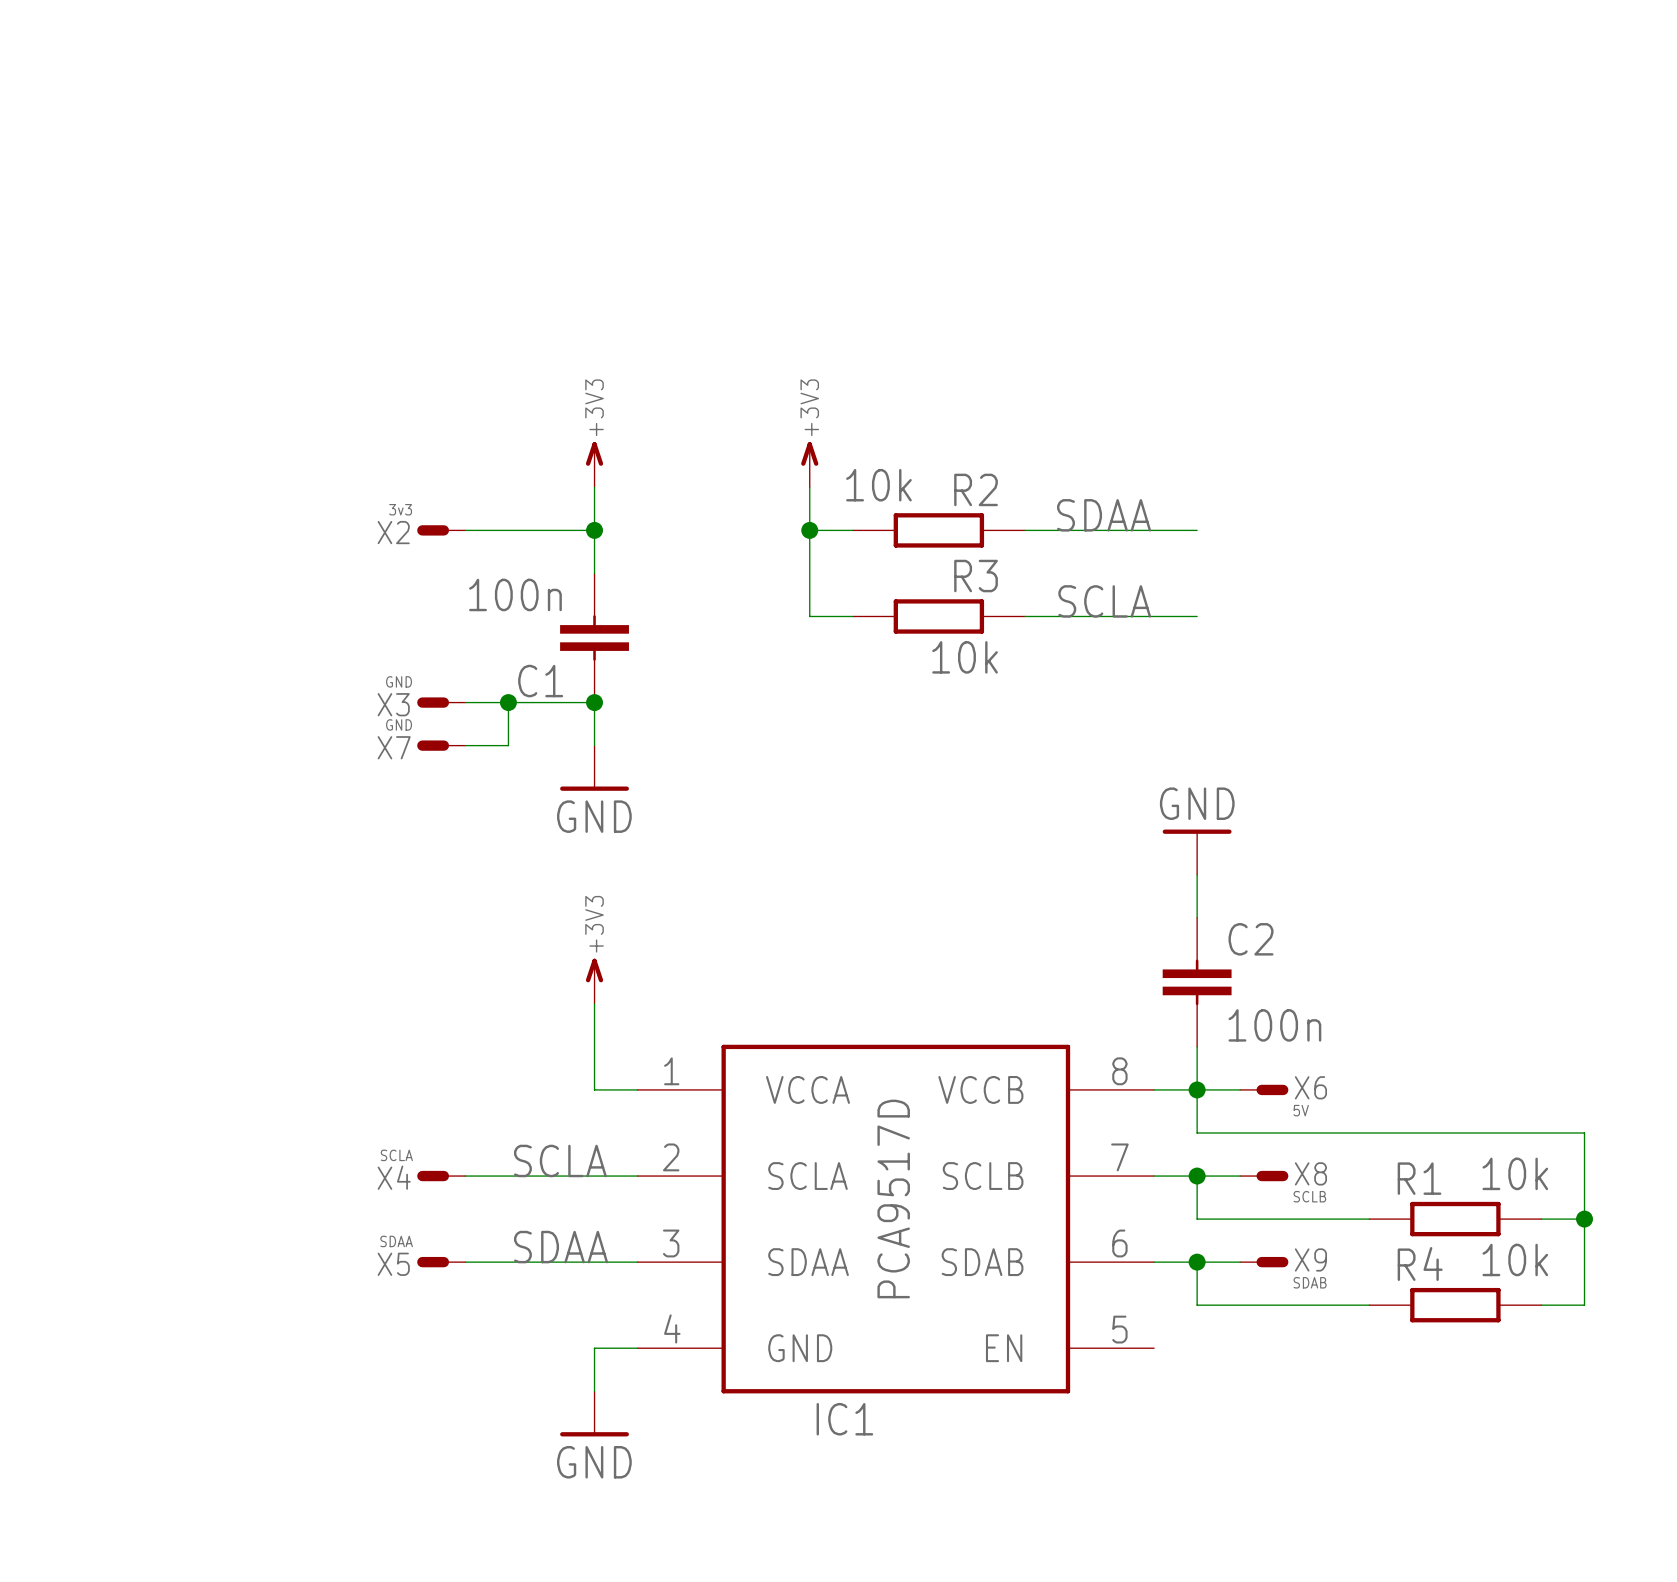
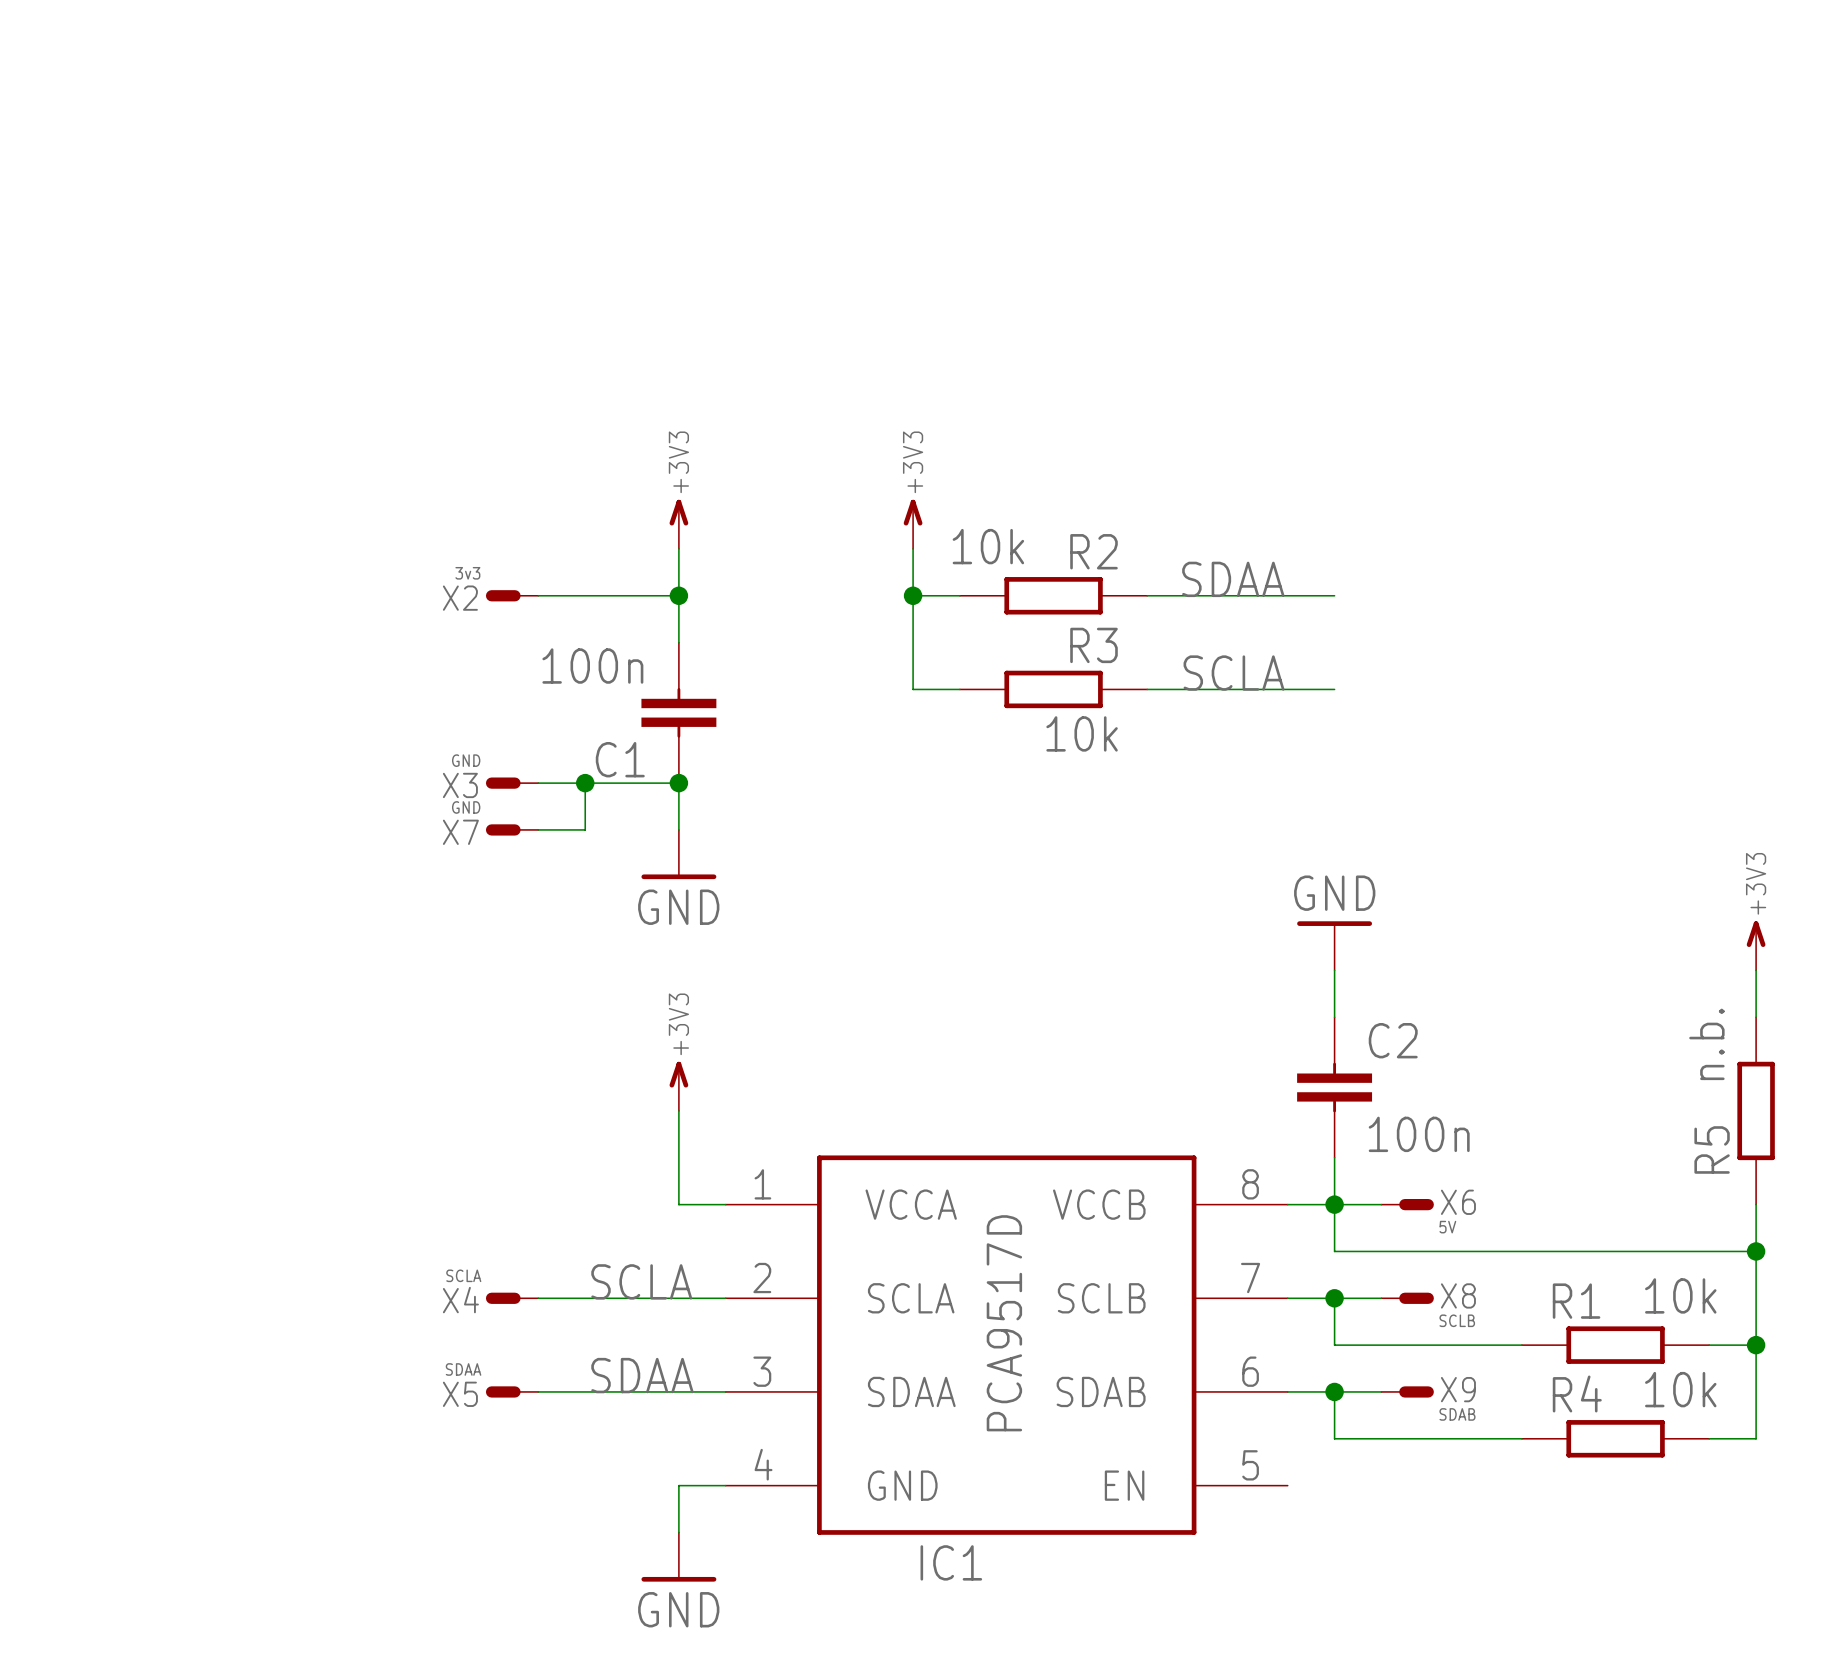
power symbol: none -> +3V3 (1756, 945)
wire: none -> (1756, 970) (1756, 1017)
R5: none -> n.b. (1756, 1110)
wire: none -> (1756, 1204) (1756, 1251)
junction: none -> (1756, 1251)

